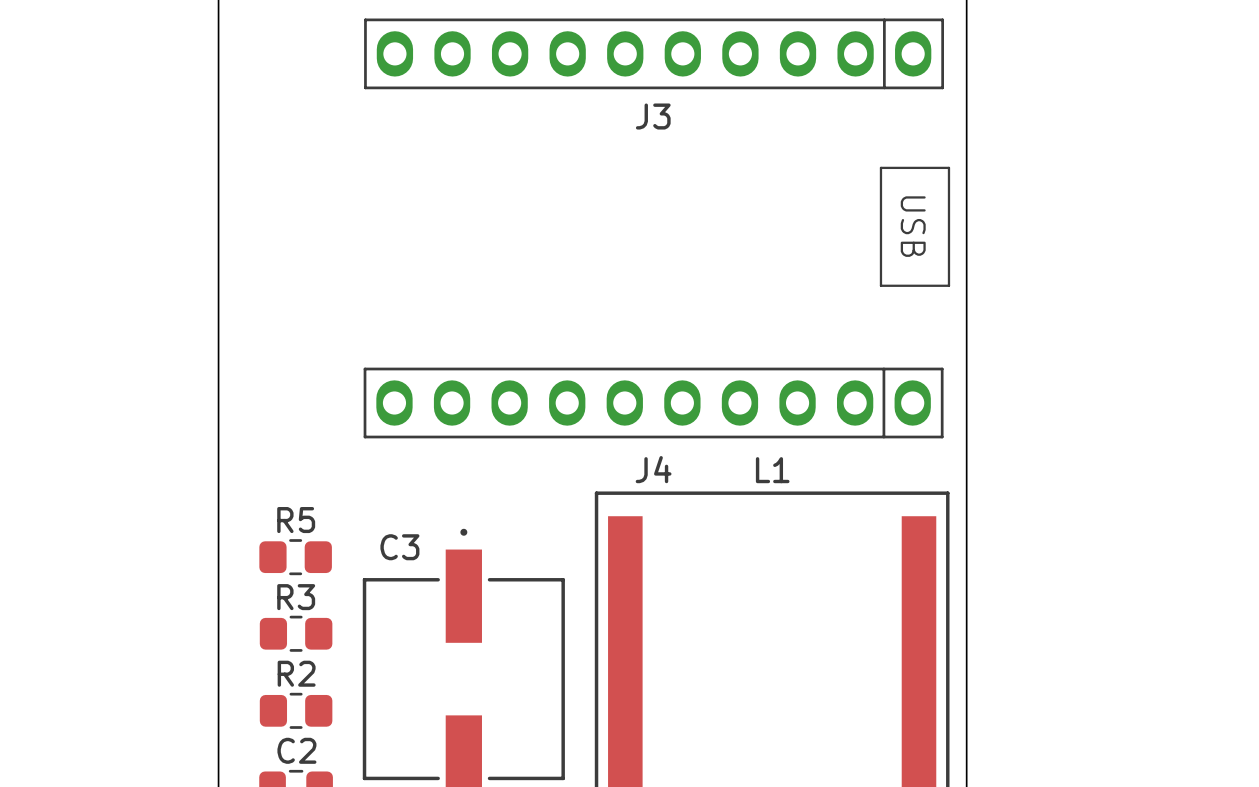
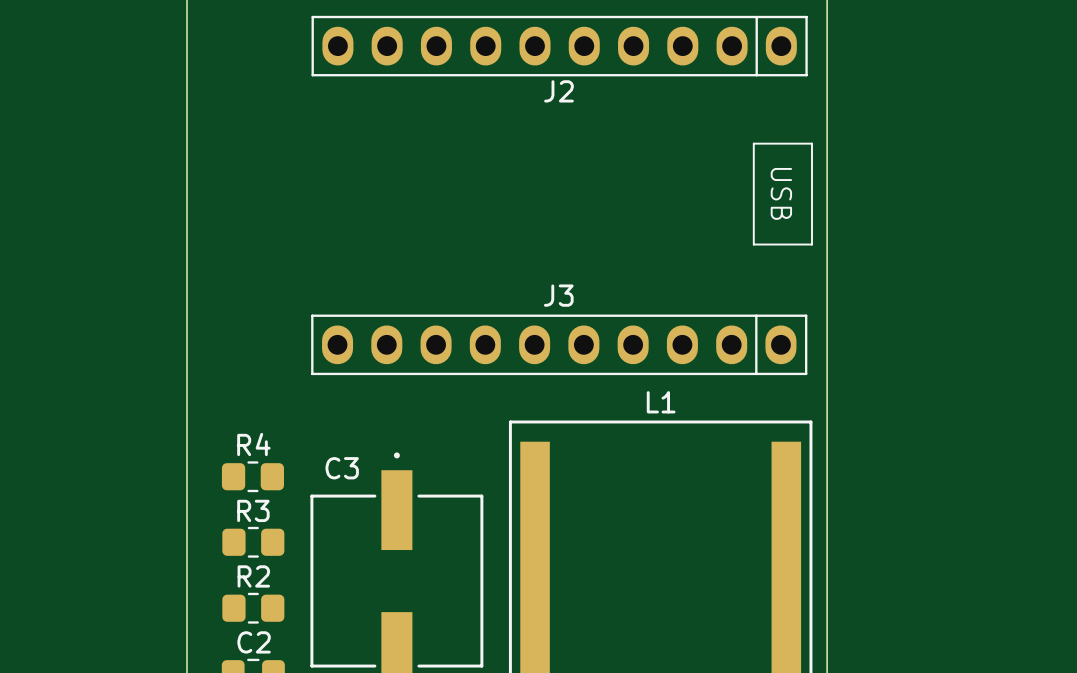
J3 name: J3 (653, 116) -> J2 (558, 91)
J4 name: J4 (653, 469) -> J3 (558, 295)
R5 name: R5 (296, 520) -> R4 (253, 444)

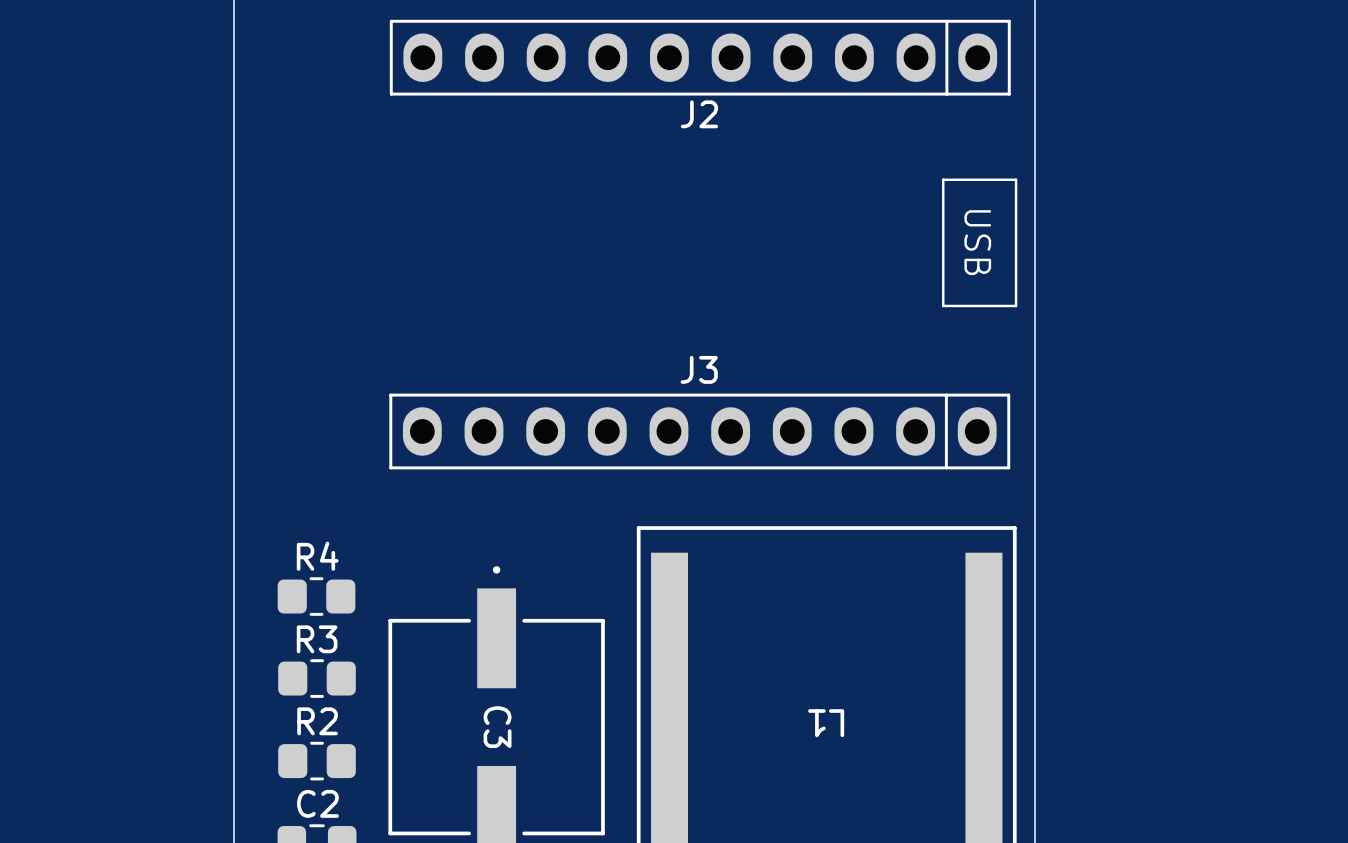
L1 name rotation: 0° (661, 402) -> 180° (826, 723)
L1 name position: L1 (661, 402) -> L1 (826, 723)
C3 name rotation: 0° (342, 468) -> 90° clockwise (497, 727)
C3 name position: C3 (342, 468) -> C3 (497, 727)

